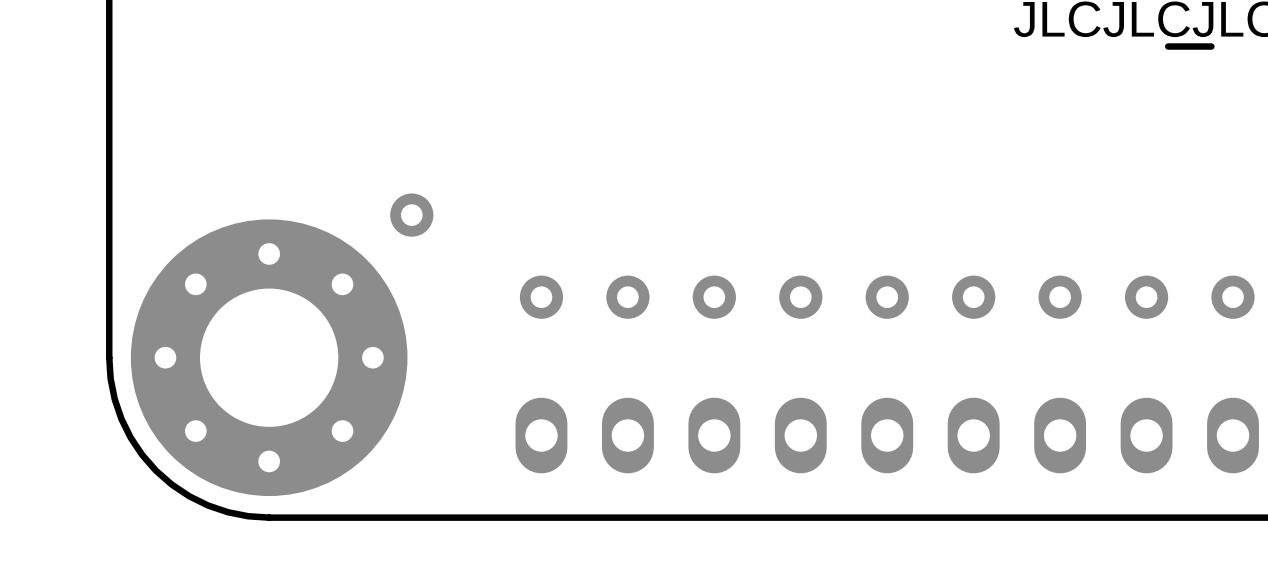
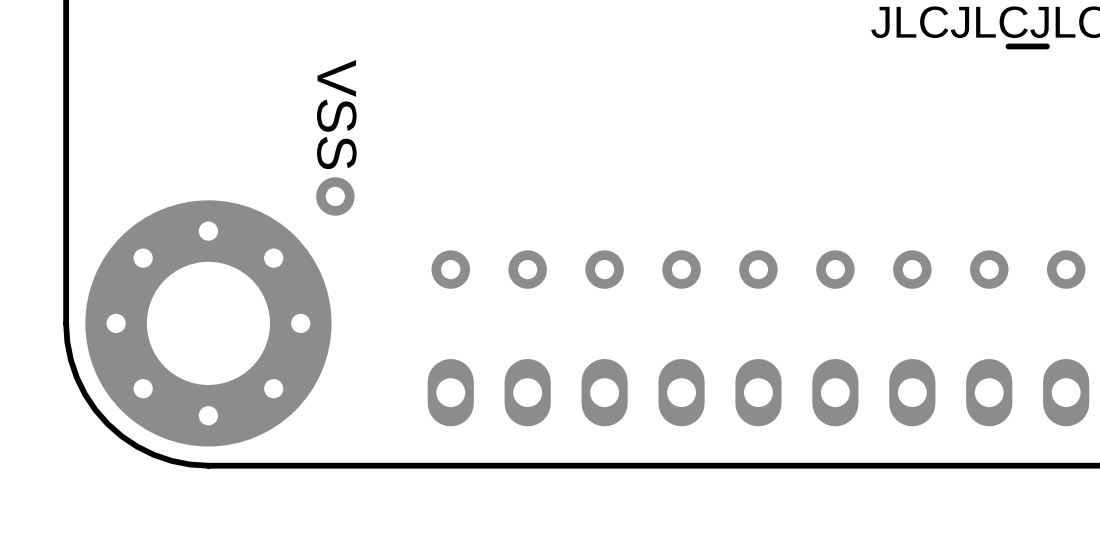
part value: none -> VSS (336, 114)

